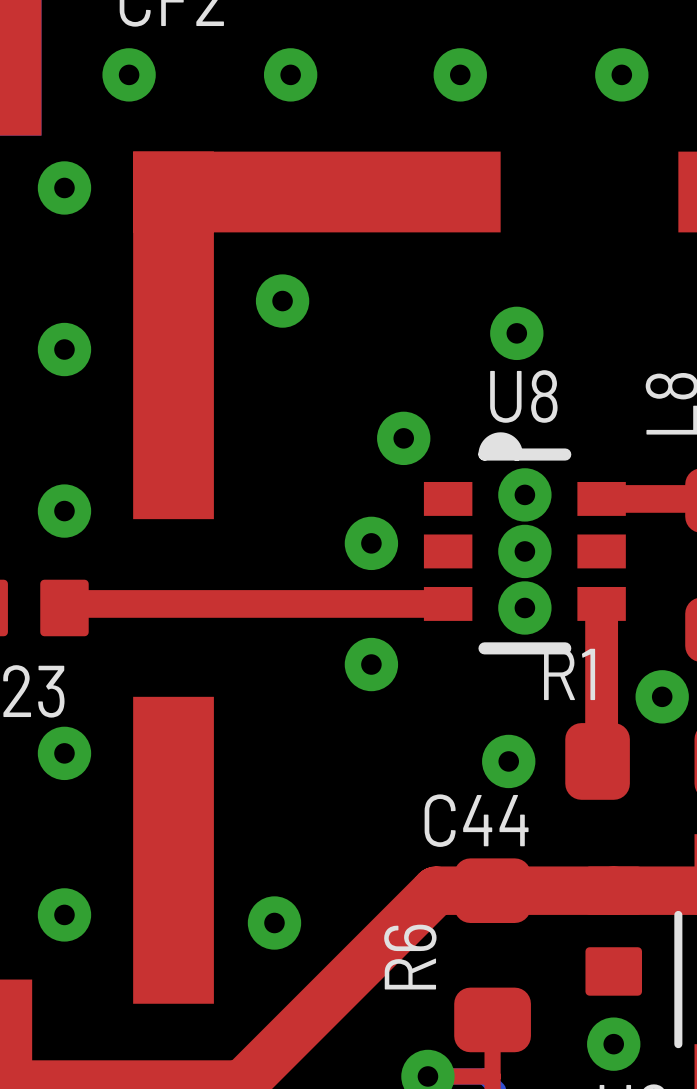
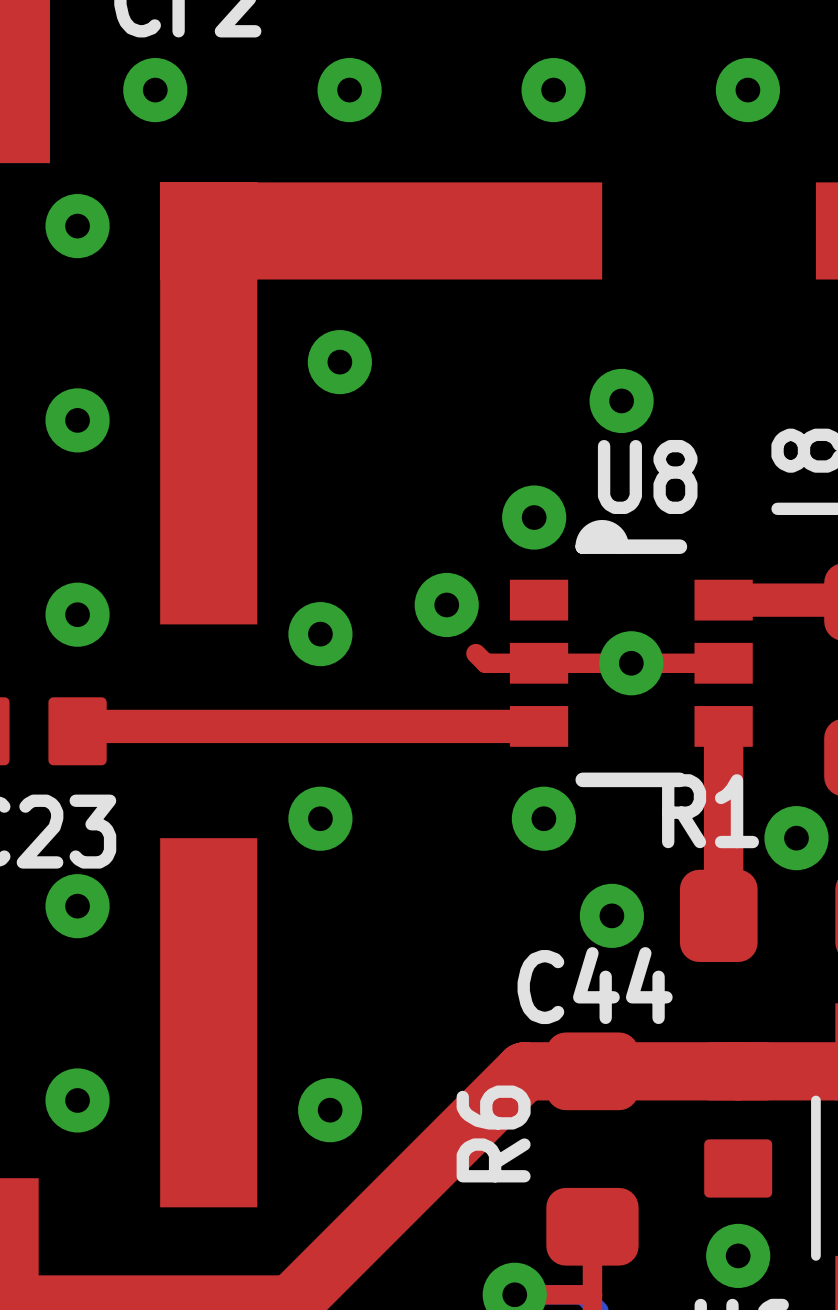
via position: (403, 438) -> (534, 517)
via: (524, 494) -> none
via: none -> (320, 634)
via position: (371, 543) -> (446, 604)
top track: none -> (475, 653) (485, 663) (723, 663)
via: (524, 607) -> none
via: (371, 664) -> none
via: none -> (320, 818)
via: none -> (543, 818)

